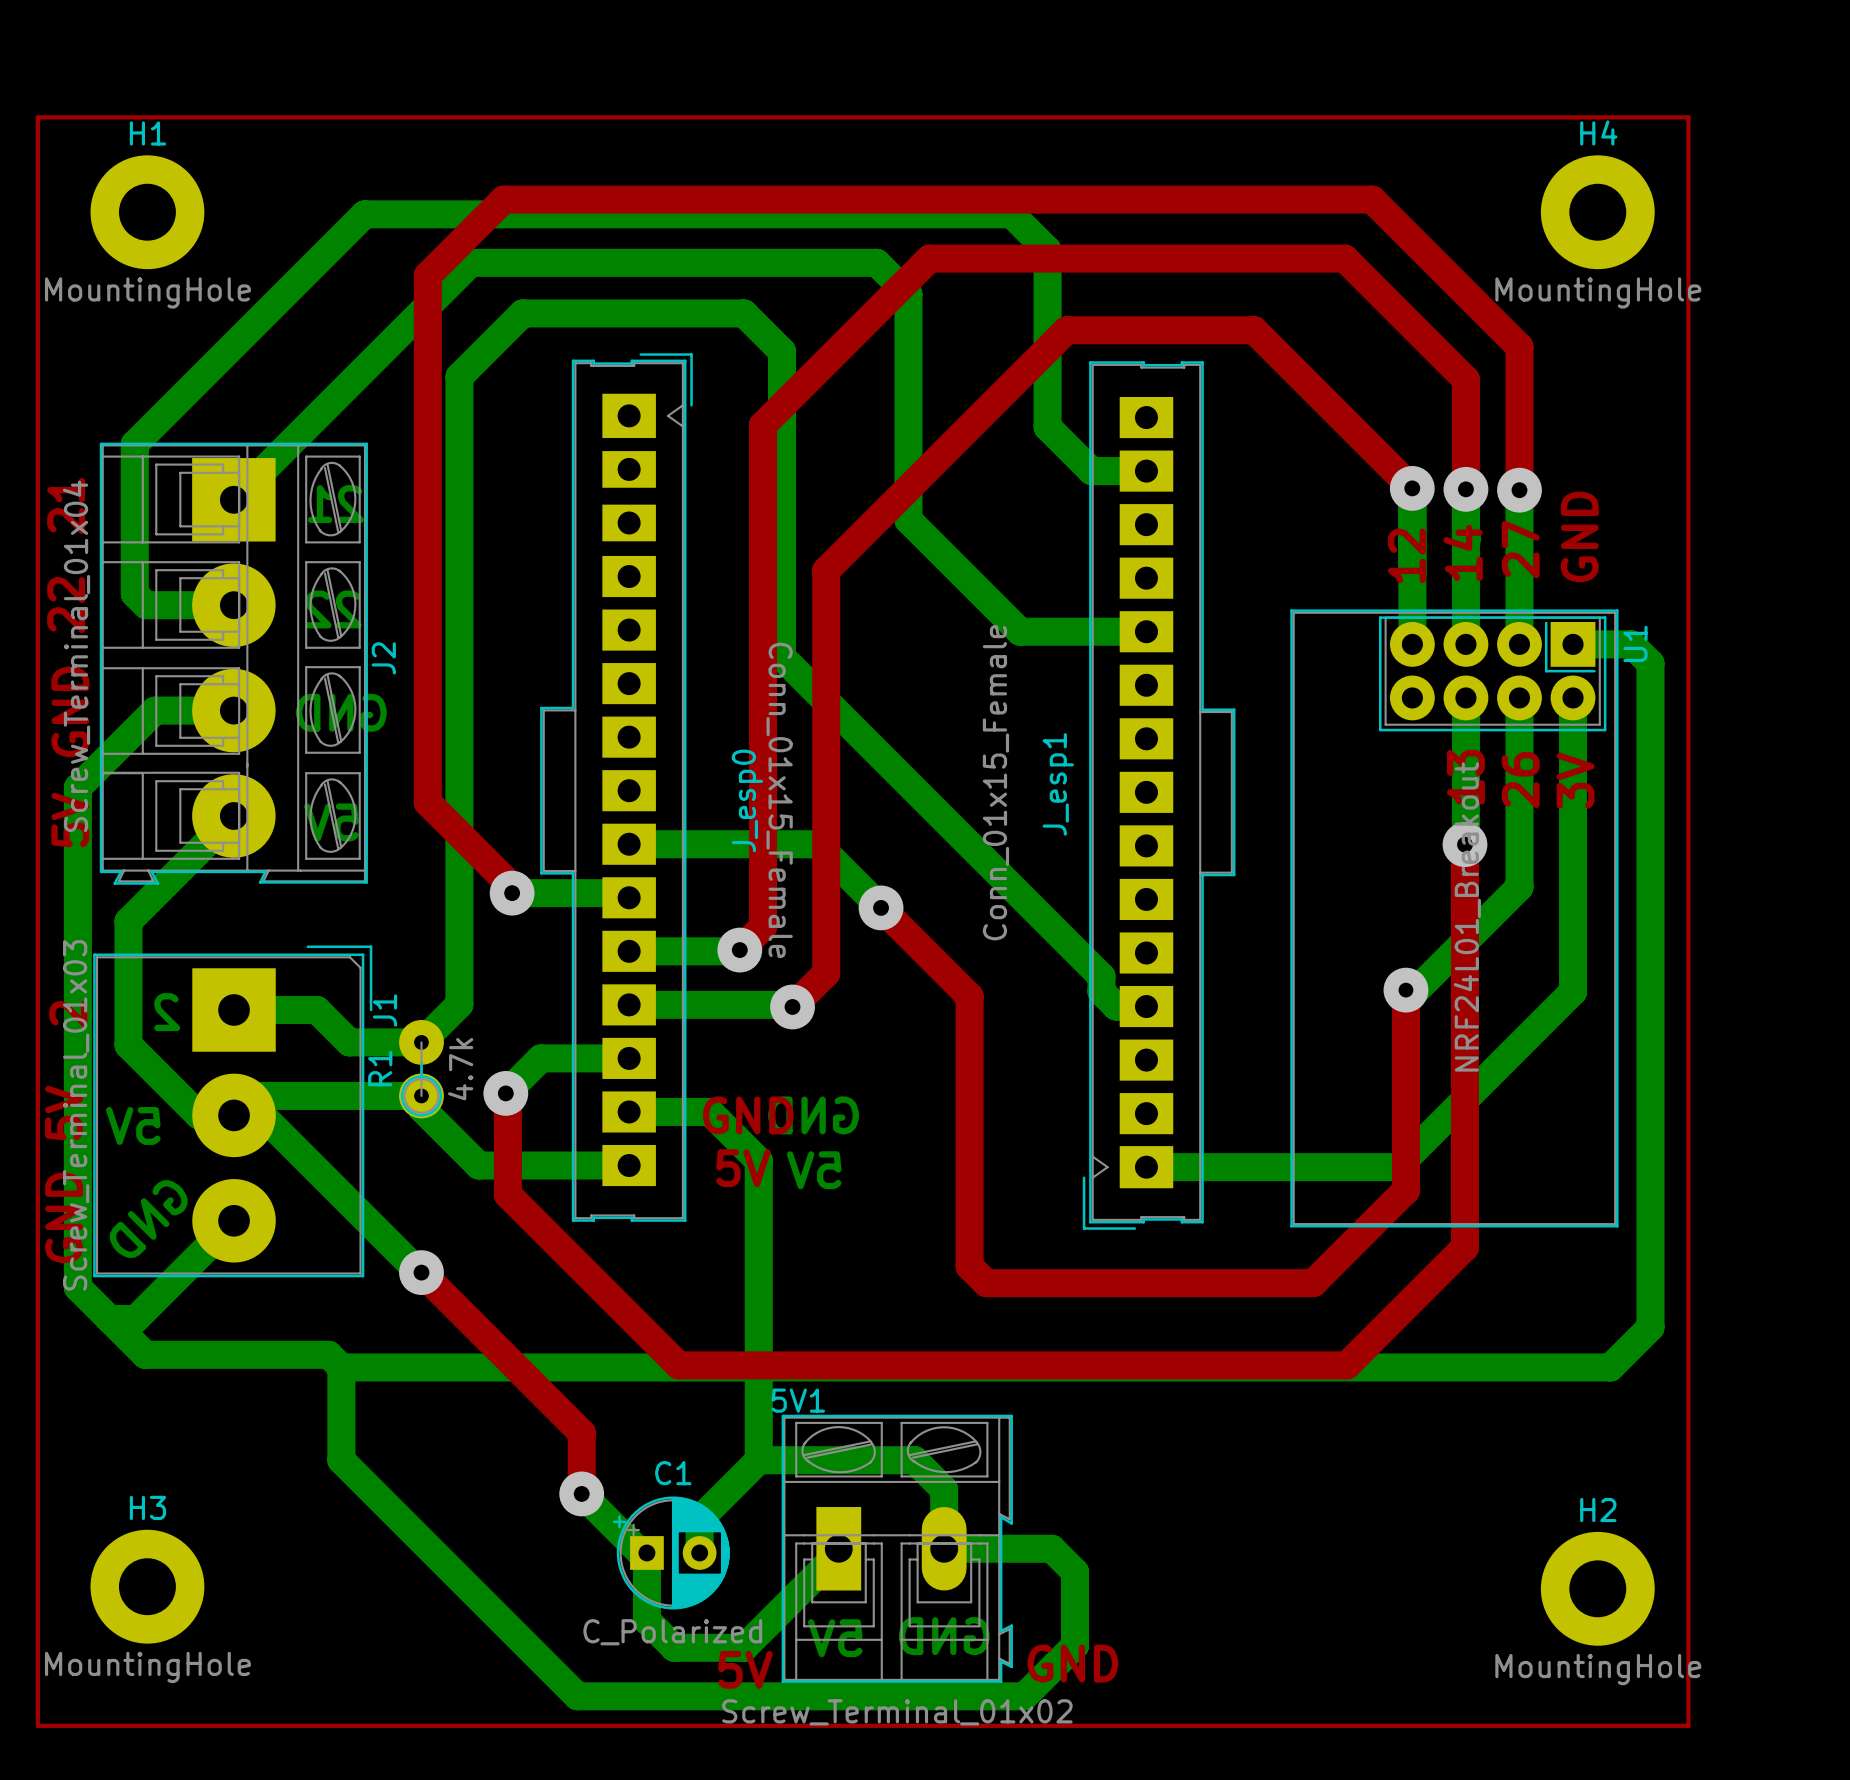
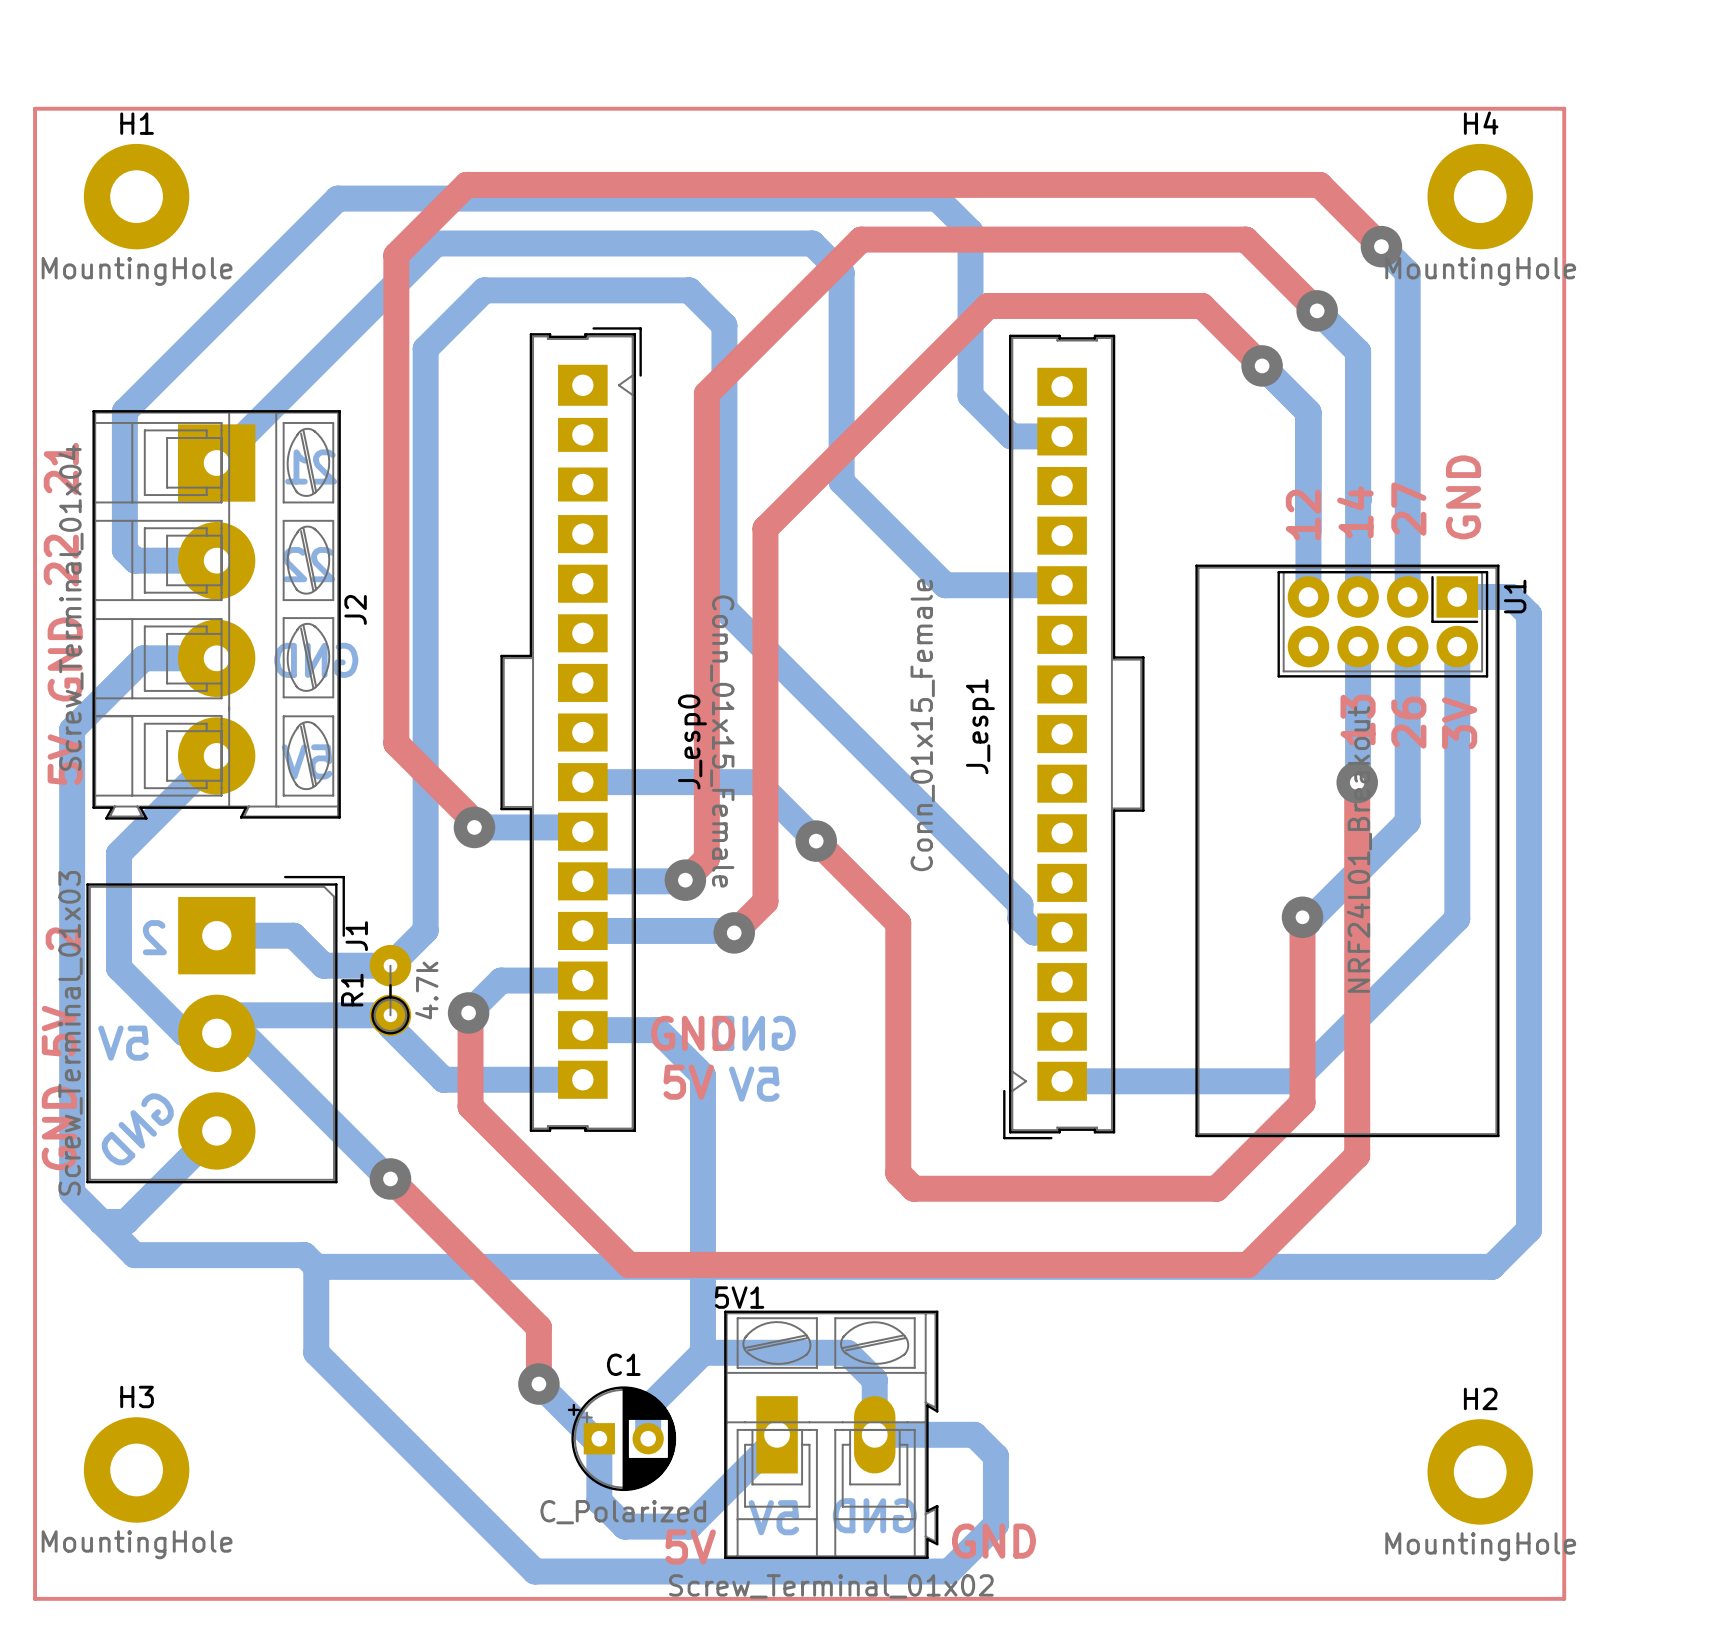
top track: (1372, 199) (1519, 346) (1519, 490) -> (1271, 184) (1319, 184) (1381, 246)
bottom track: none -> (1381, 246) (1407, 272) (1407, 454)
via: none -> (1381, 246)
top track: (1254, 330) (1412, 488) -> (1161, 305) (1202, 305) (1262, 365)
top track: (1421, 335) (1465, 379) (1465, 489) -> none
bottom track: none -> (1317, 310) (1358, 351) (1358, 453)
via: none -> (1317, 310)
bottom track: none -> (1262, 365) (1308, 412) (1308, 452)
via: none -> (1262, 365)
via: (1412, 488) -> none
via: (1465, 489) -> none
via: (1519, 490) -> none

